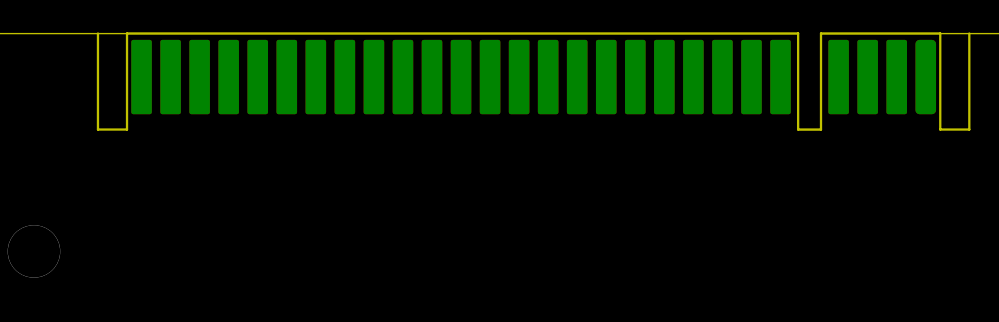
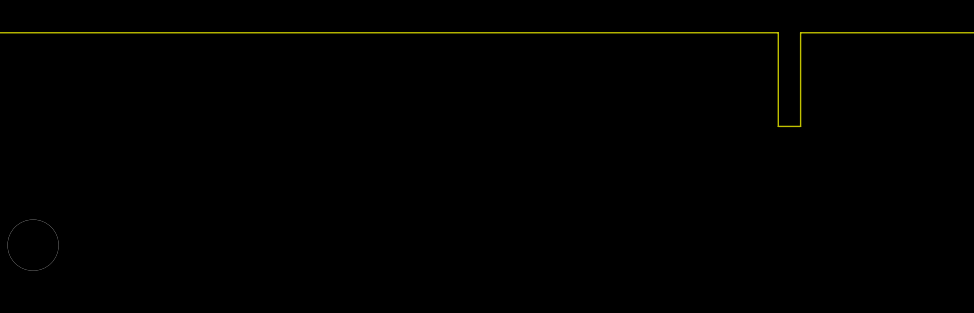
part: (533, 81) -> none

